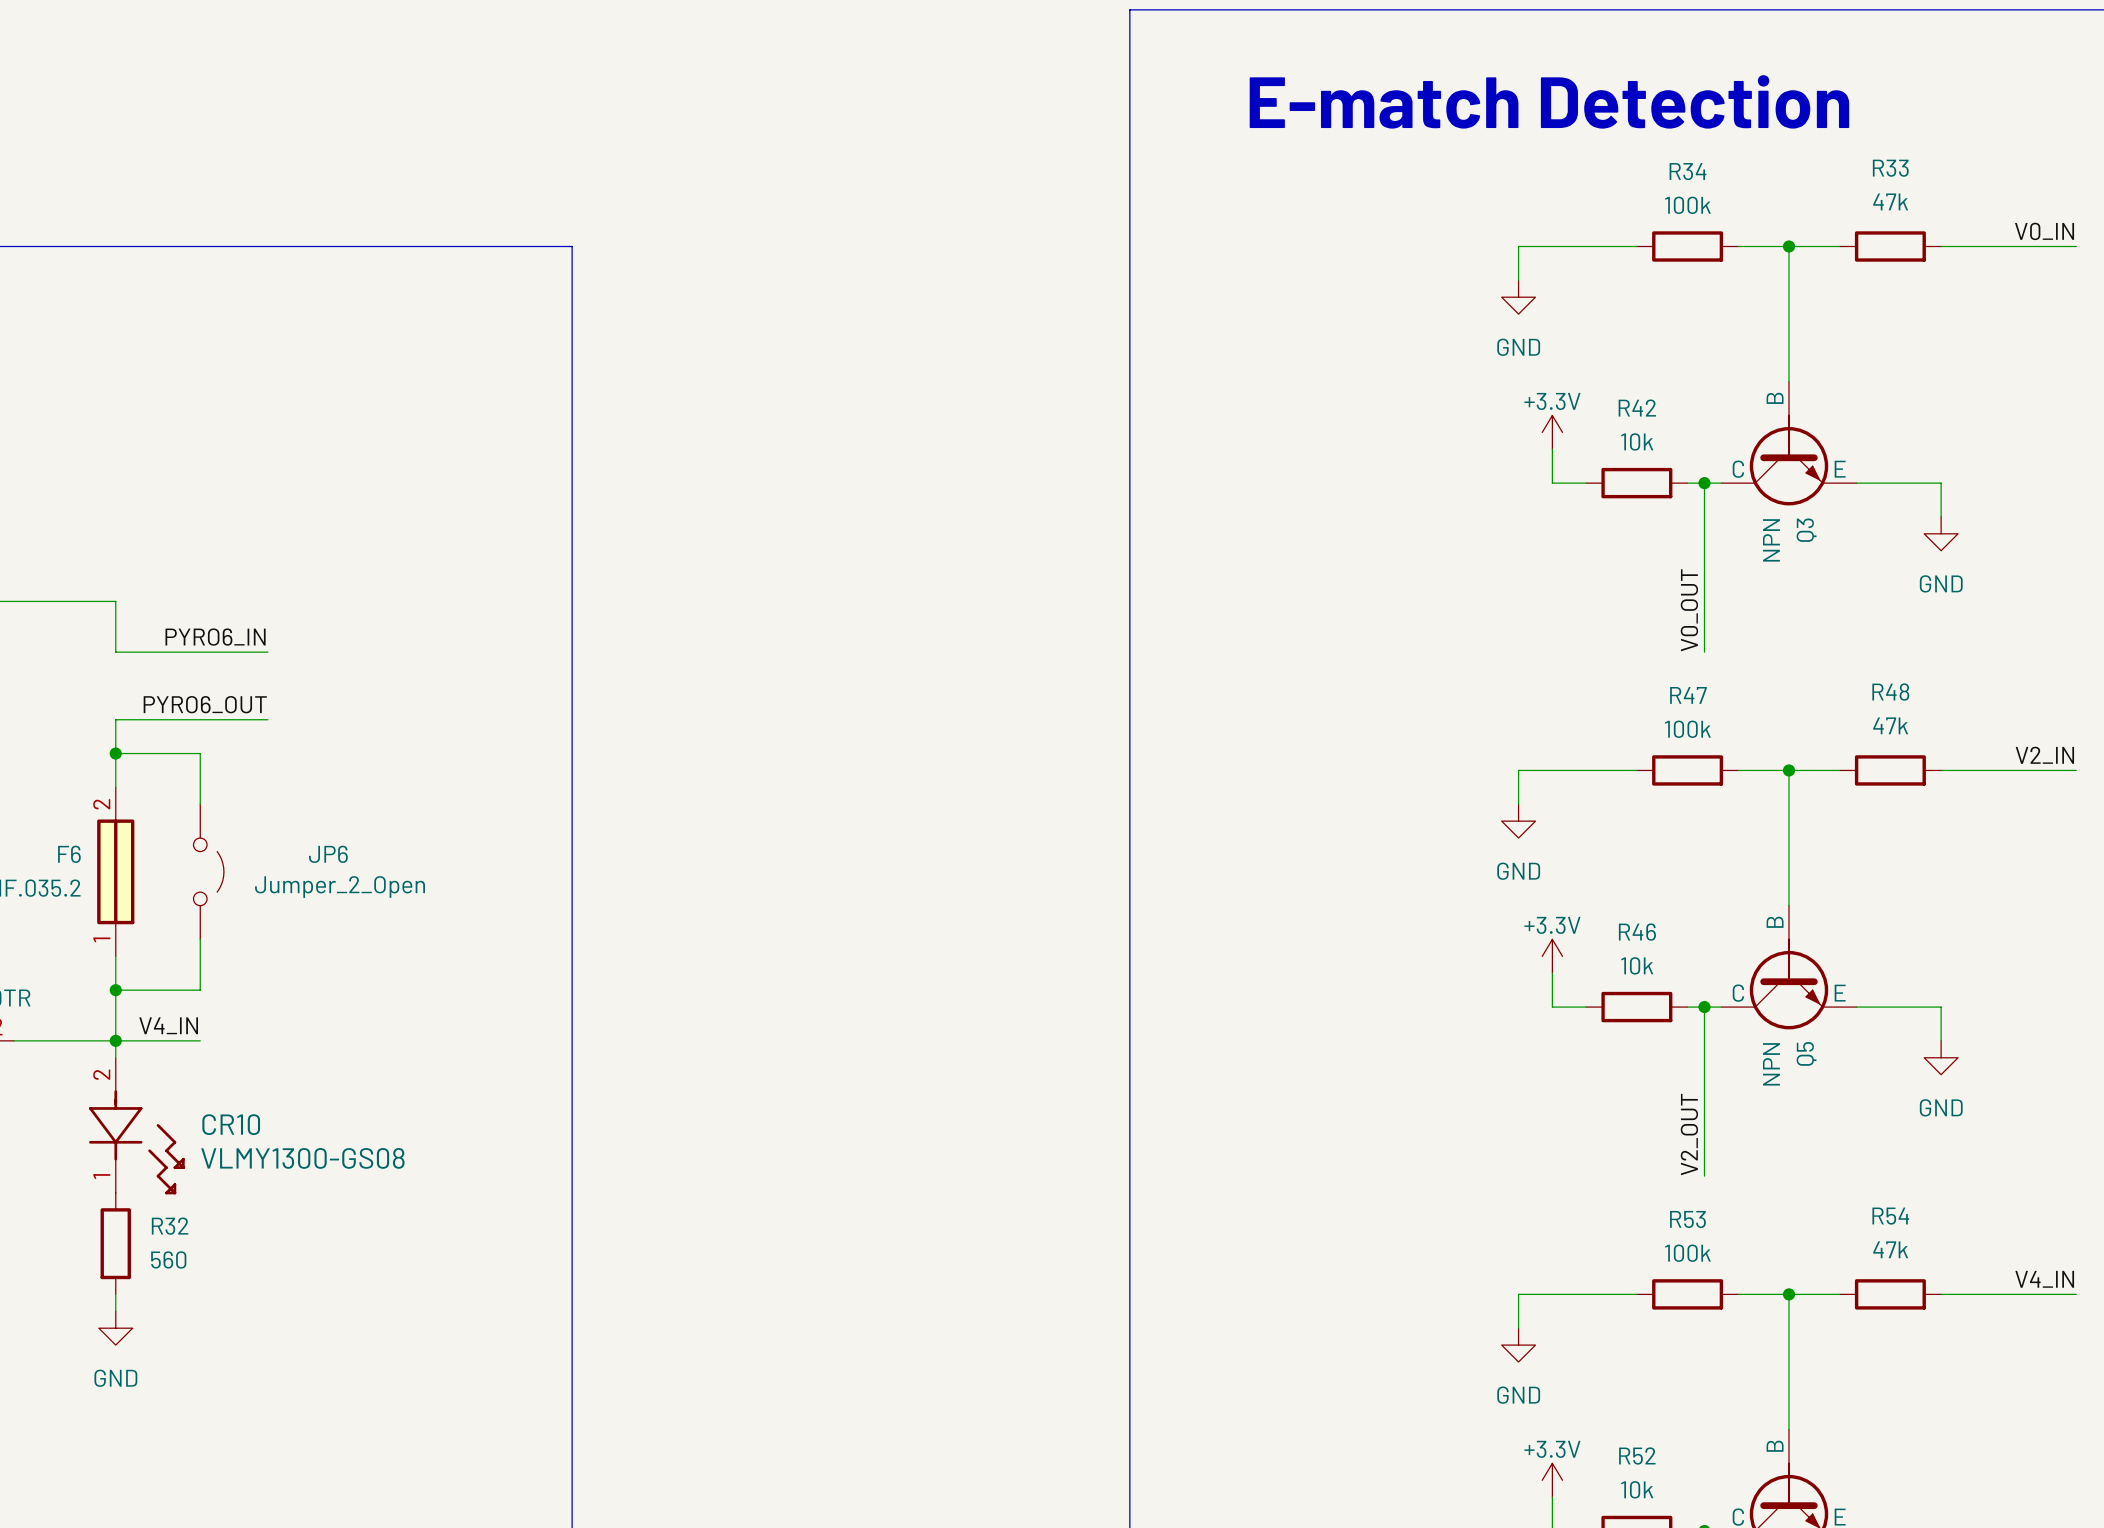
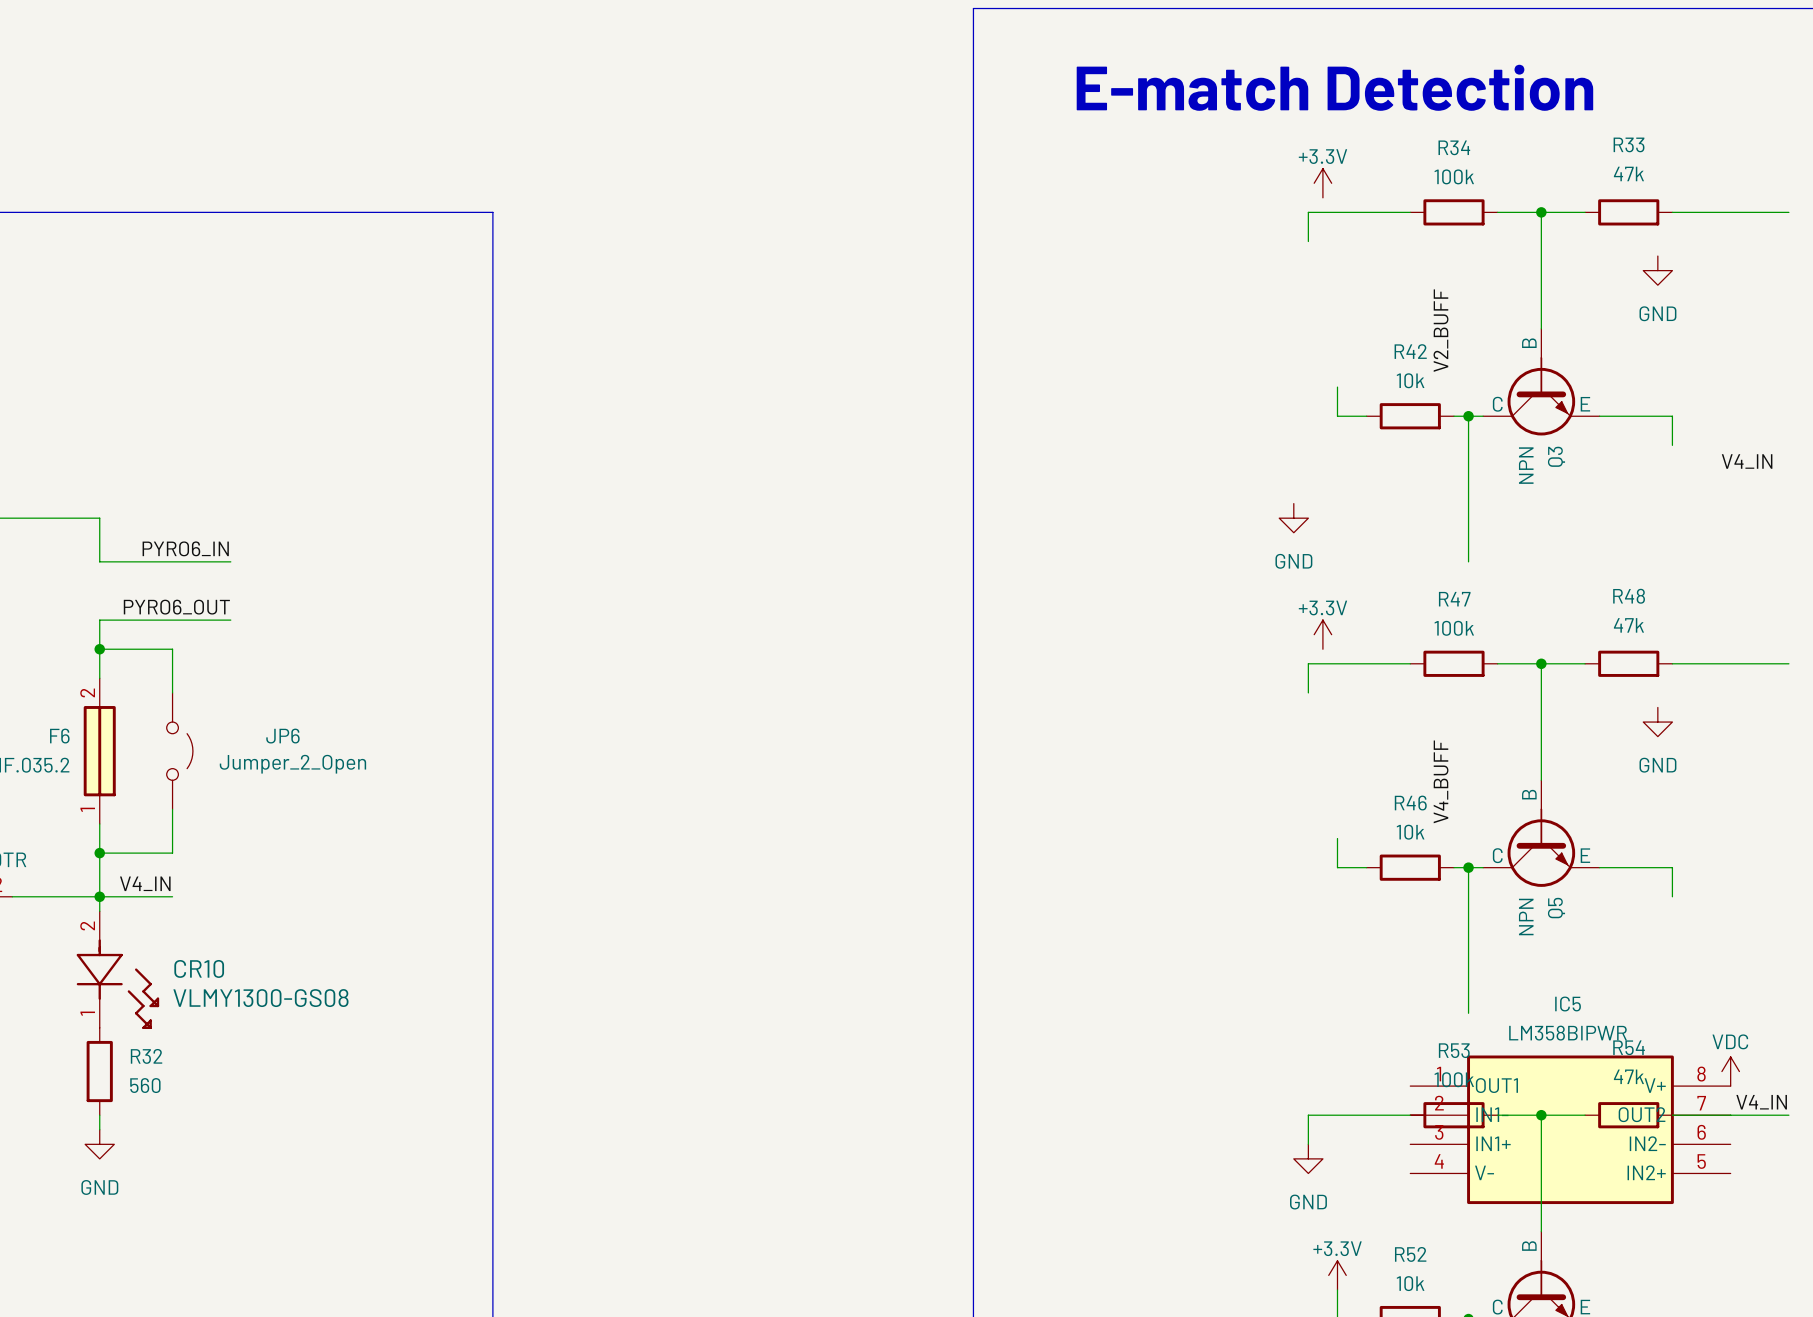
power symbol: none -> +3.3V (1322, 183)
label: V0_IN (2044, 231) -> none
power symbol: GND (1518, 297) -> none
power symbol: none -> GND (1657, 270)
label: none -> V2_BUFF (1440, 330)
power symbol: +3.3V (1552, 432) -> none
power symbol: GND (1941, 533) -> none
label: none -> V4_IN (1747, 461)
power symbol: none -> GND (1293, 518)
label: V0_OUT (1689, 610) -> none
power symbol: none -> +3.3V (1322, 634)
label: V2_IN (2044, 755) -> none
power symbol: GND (1518, 821) -> none
power symbol: none -> GND (1657, 722)
label: none -> V4_BUFF (1441, 781)
power symbol: +3.3V (1552, 956) -> none
power symbol: GND (1941, 1057) -> none
label: V2_OUT (1689, 1134) -> none
power symbol: none -> VDC (1730, 1071)
IC5: none -> LM358BIPWR (1570, 1129)

